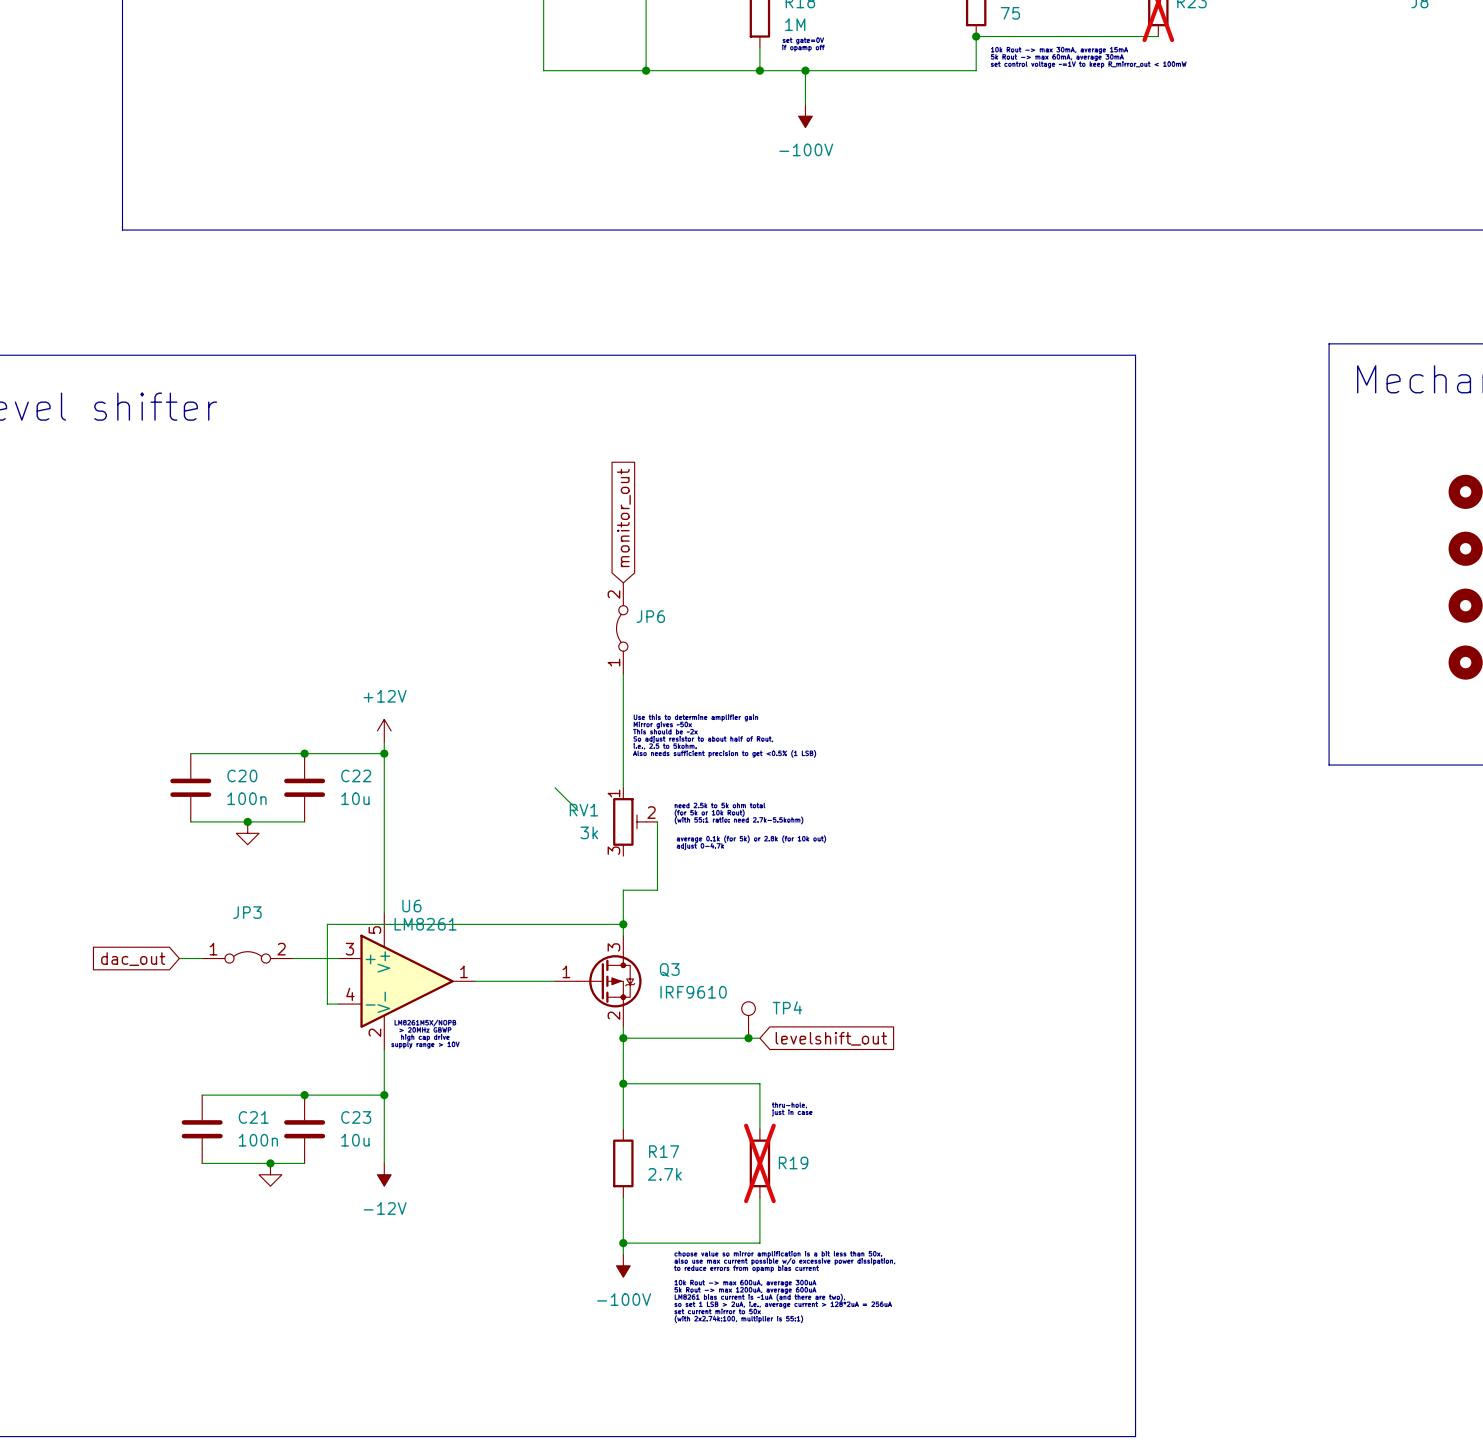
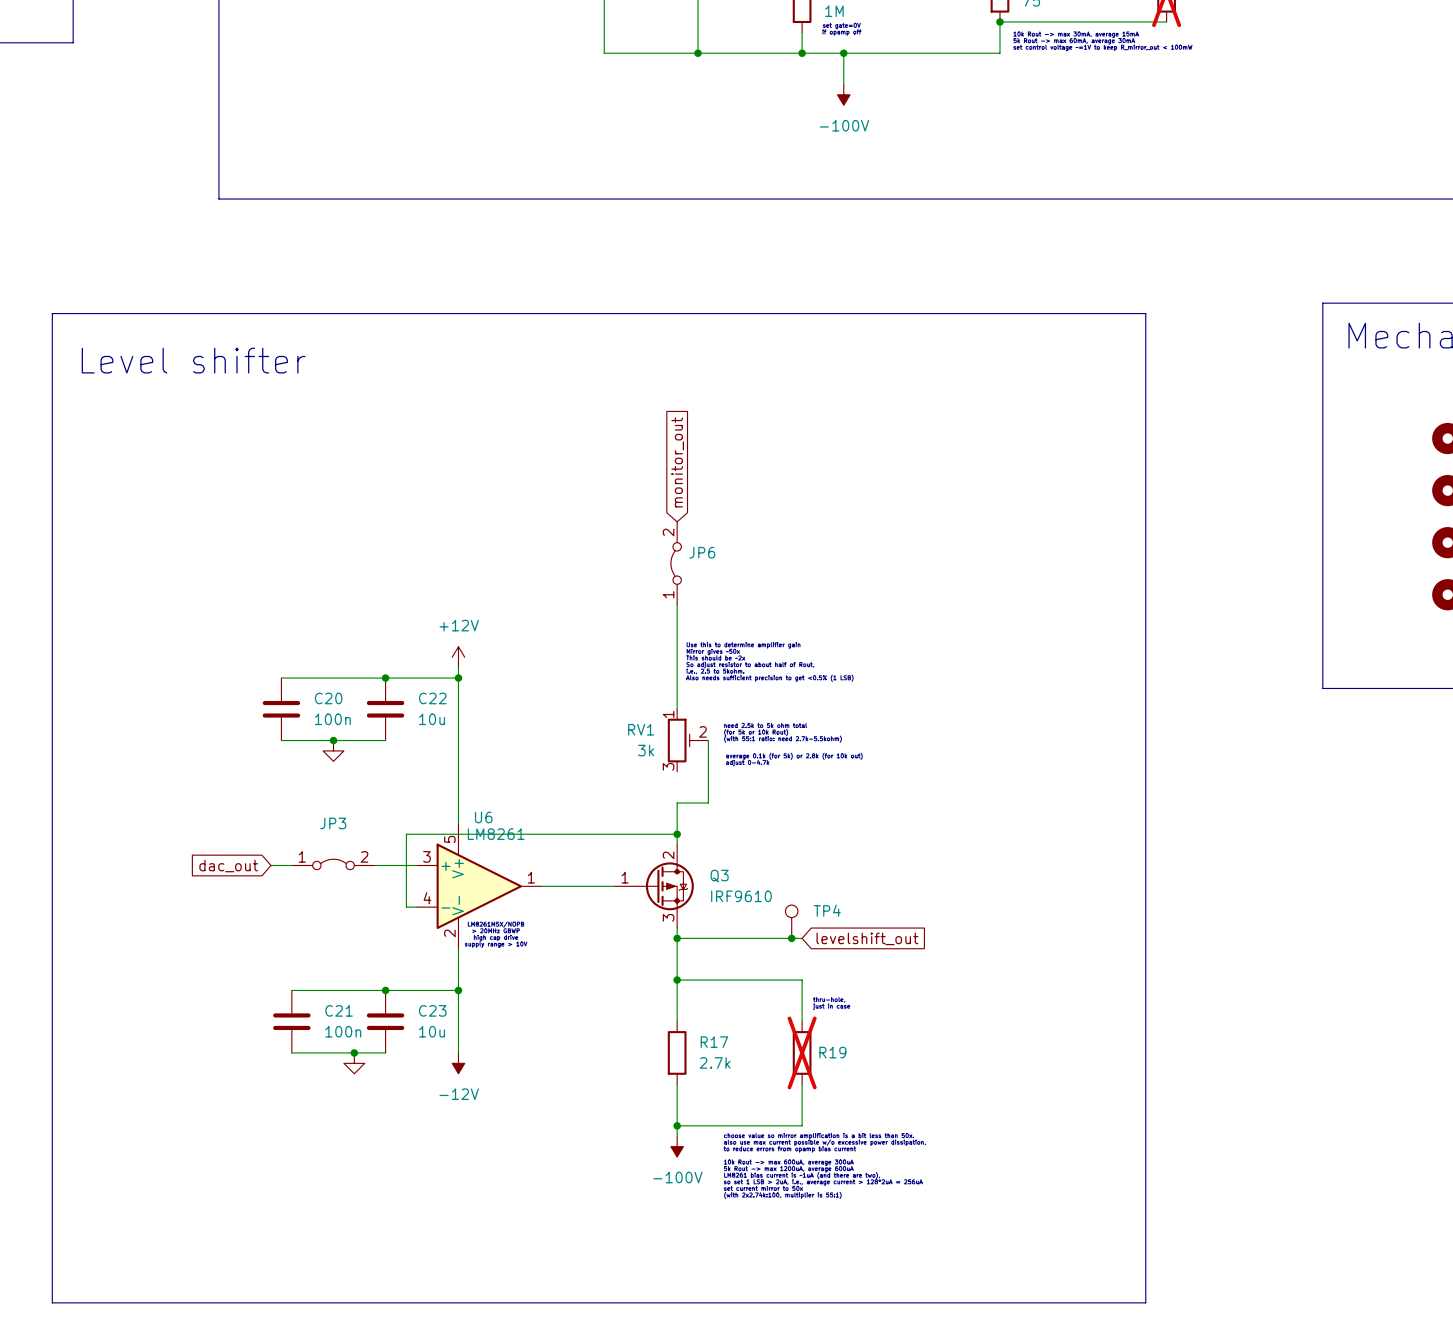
wire: (555, 787) (577, 810) -> none
Q3 pin number: 3 (613, 947) -> 2 (668, 855)
Q3 pin number: 2 (613, 1015) -> 3 (668, 917)

